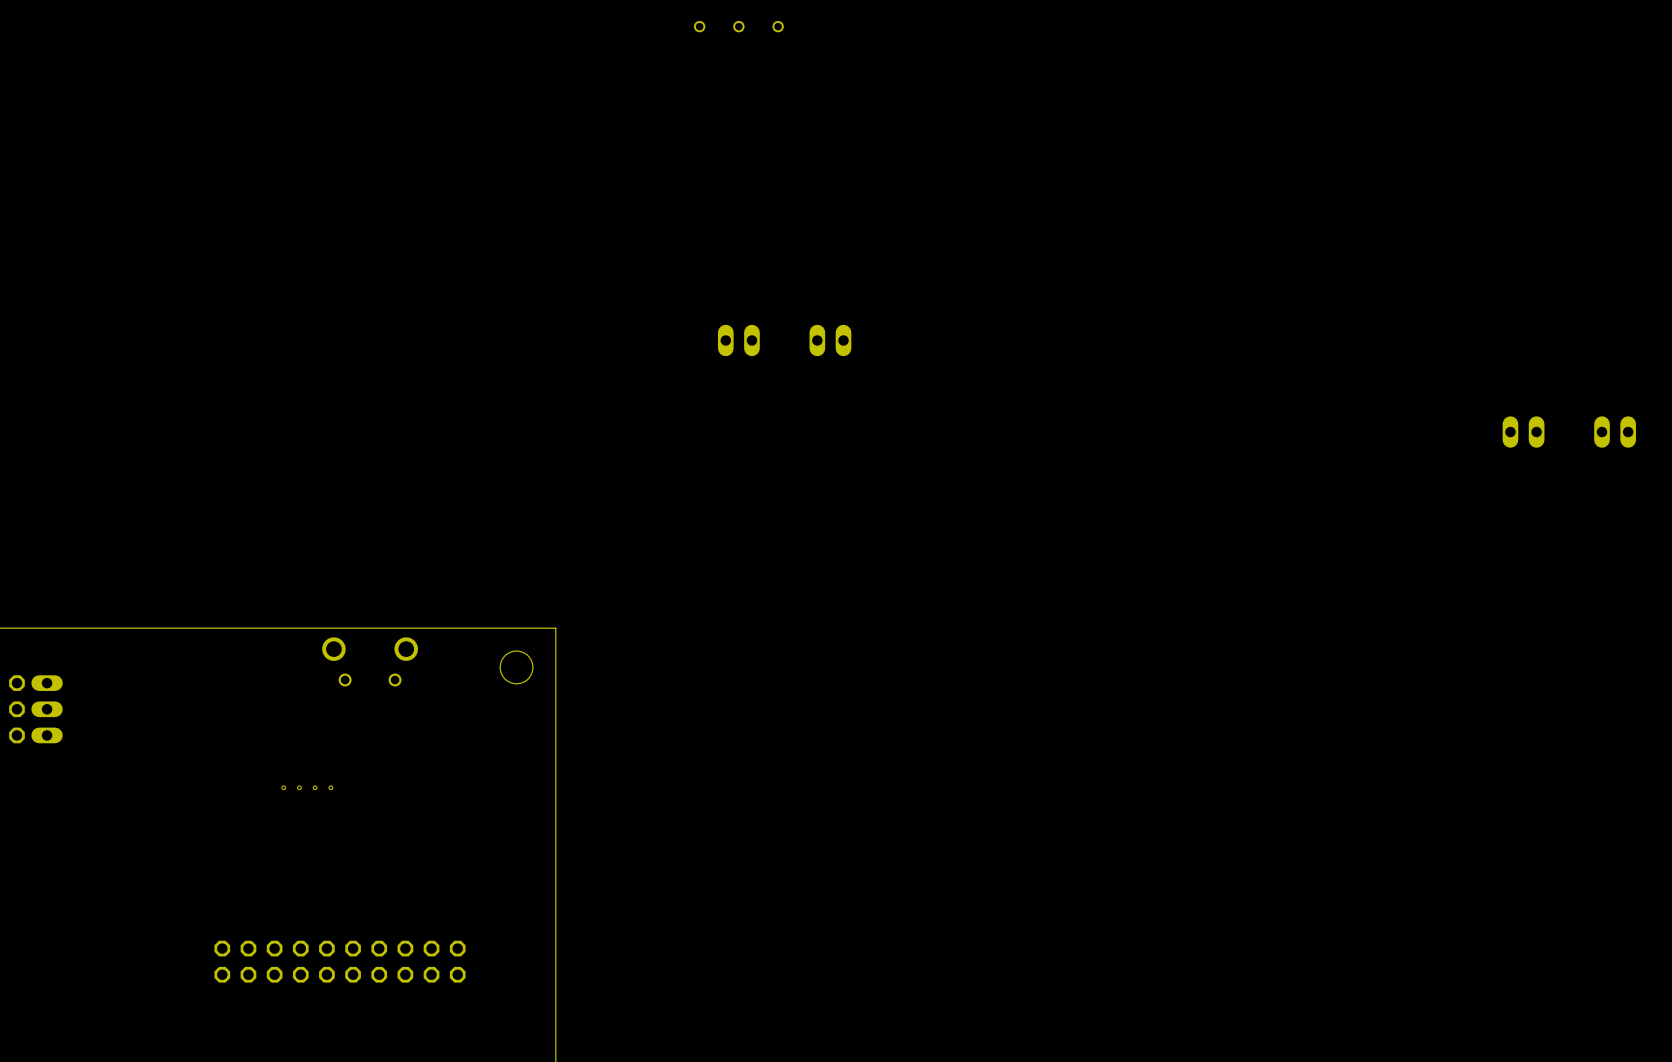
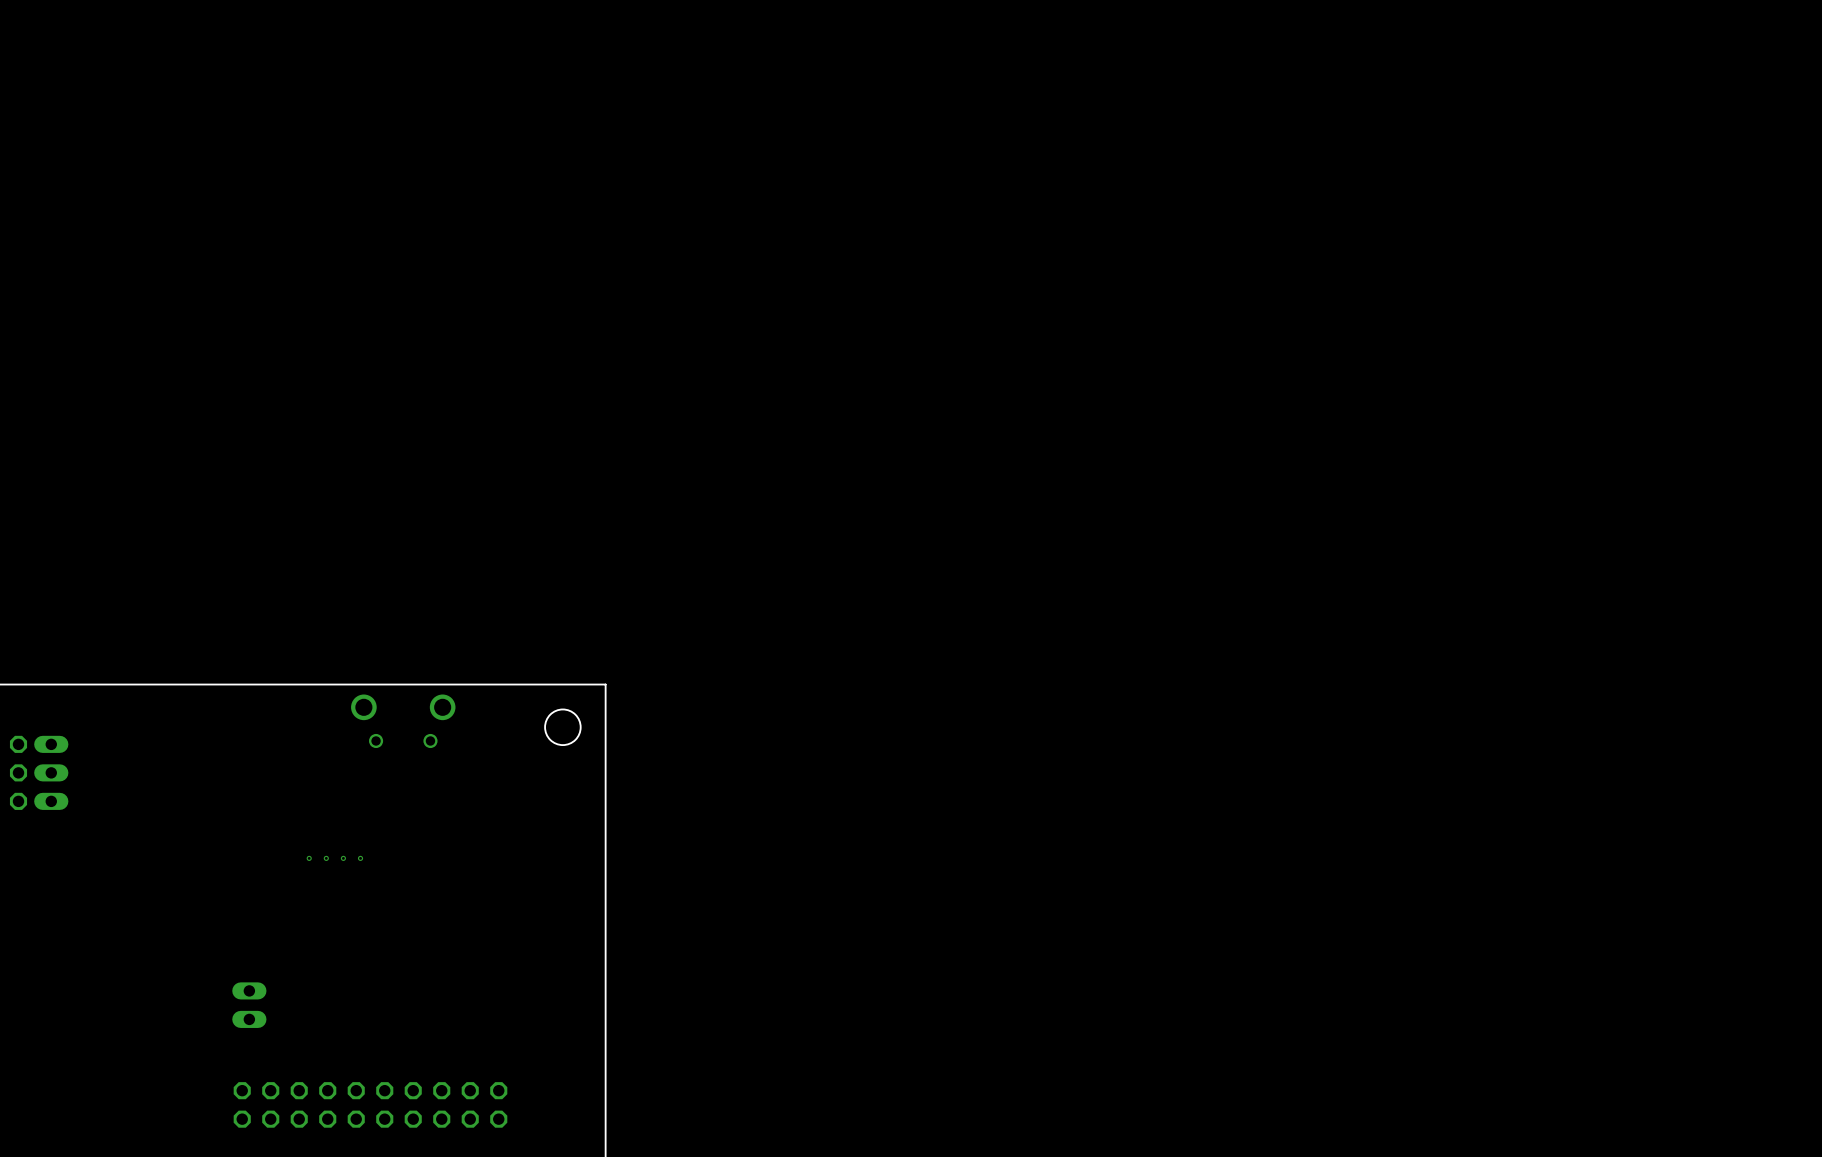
part: (699, 26) -> none
part: (738, 26) -> none
part: (778, 26) -> none
part: (738, 340) -> none
part: (830, 340) -> none
part: (1523, 432) -> none
part: (1615, 432) -> none
part: none -> (249, 1005)
part: (340, 961) -> none
part: none -> (370, 1104)

